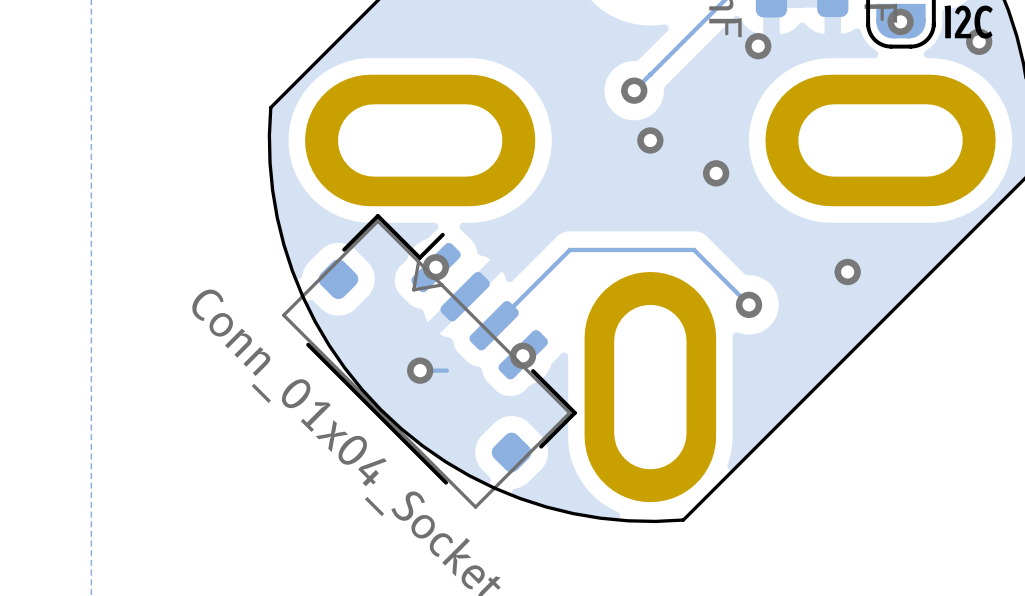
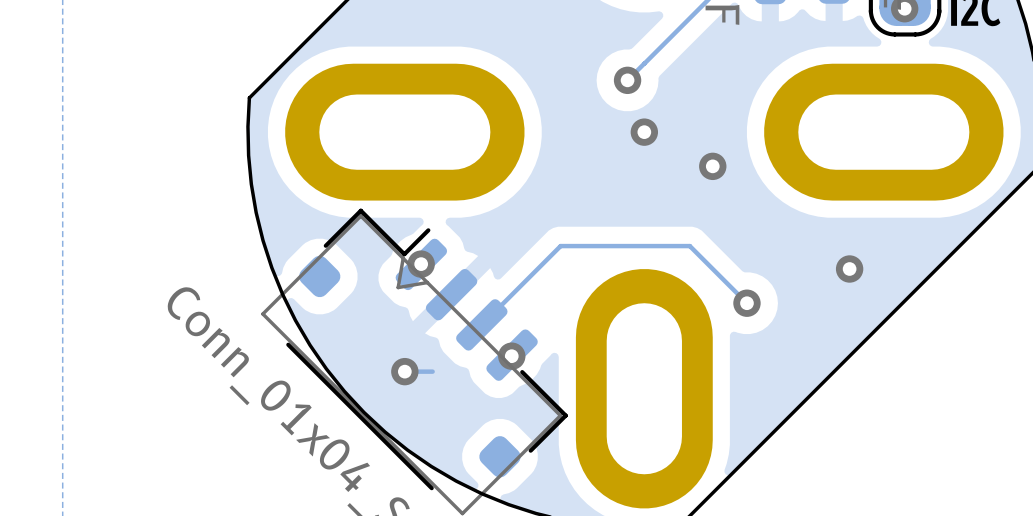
via: (979, 41) -> none
via: (758, 46) -> none

